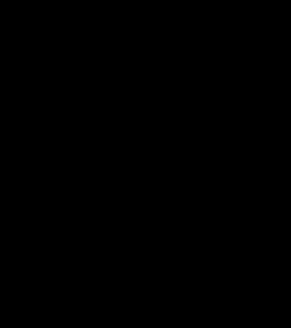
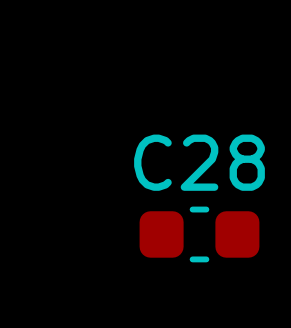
C28: none -> (199, 234)

